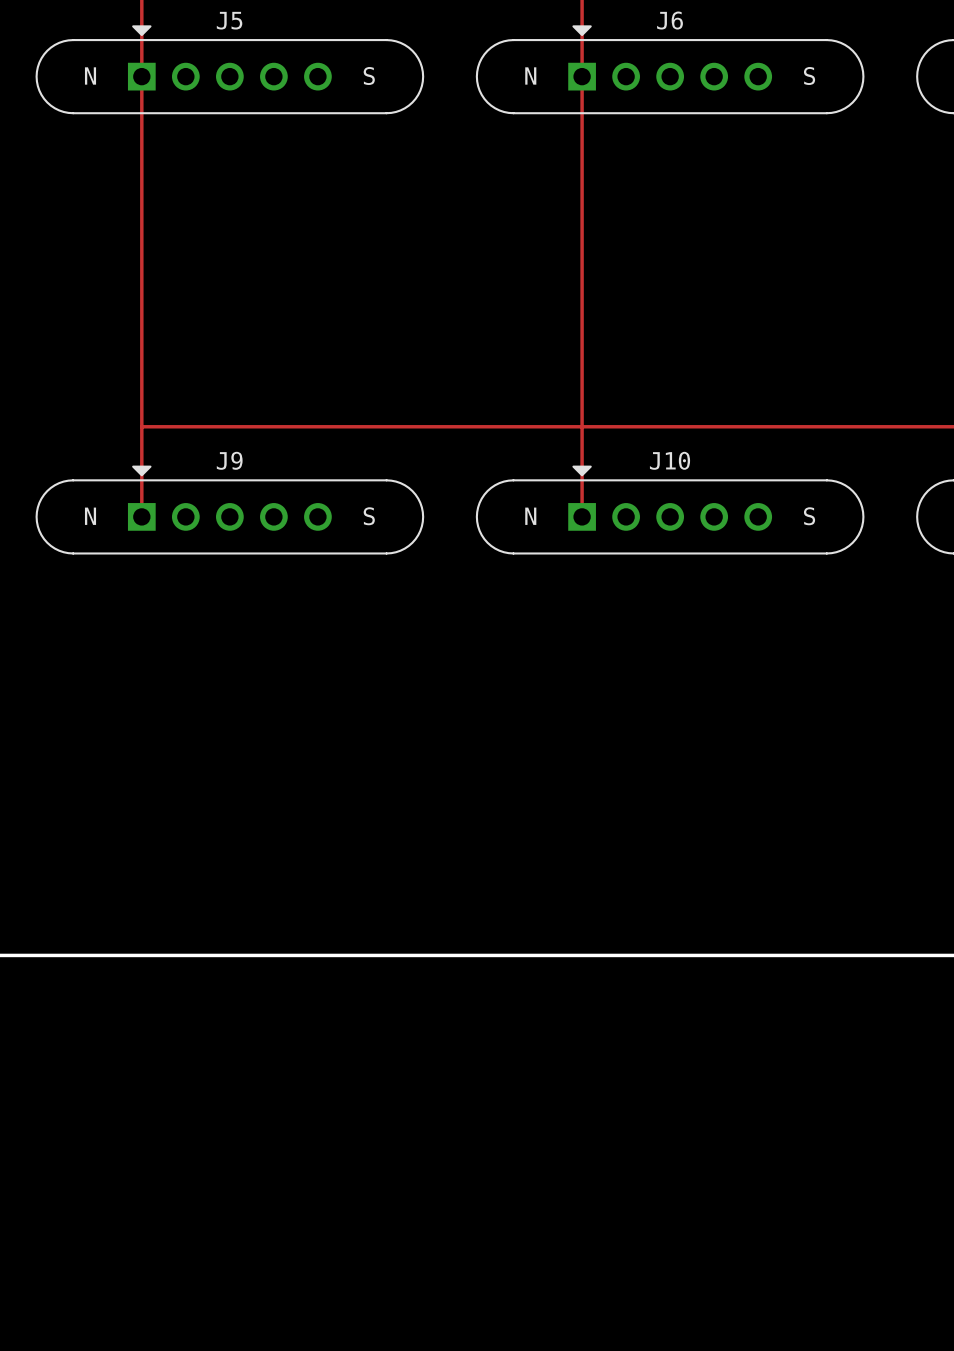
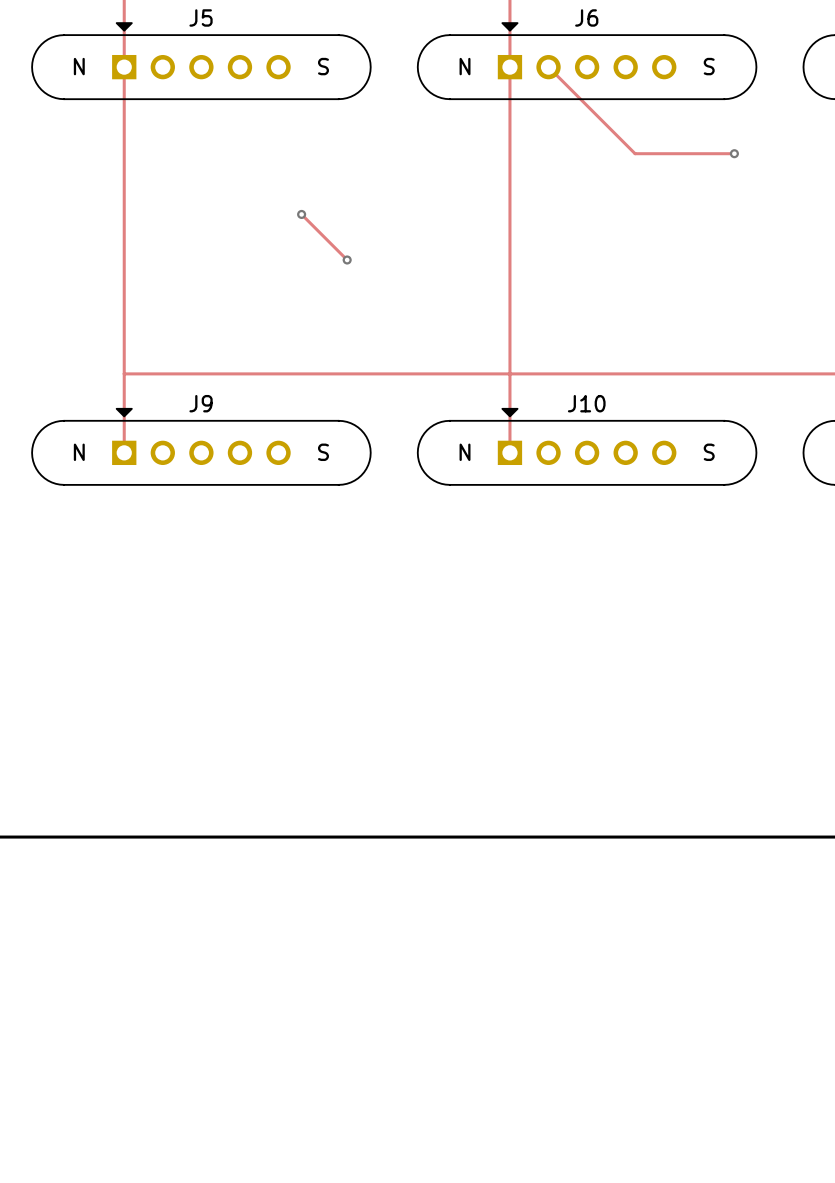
track: none -> (548, 67) (635, 153) (734, 153)
via: none -> (734, 153)
track: none -> (301, 214) (347, 260)
via: none -> (301, 214)
via: none -> (347, 260)

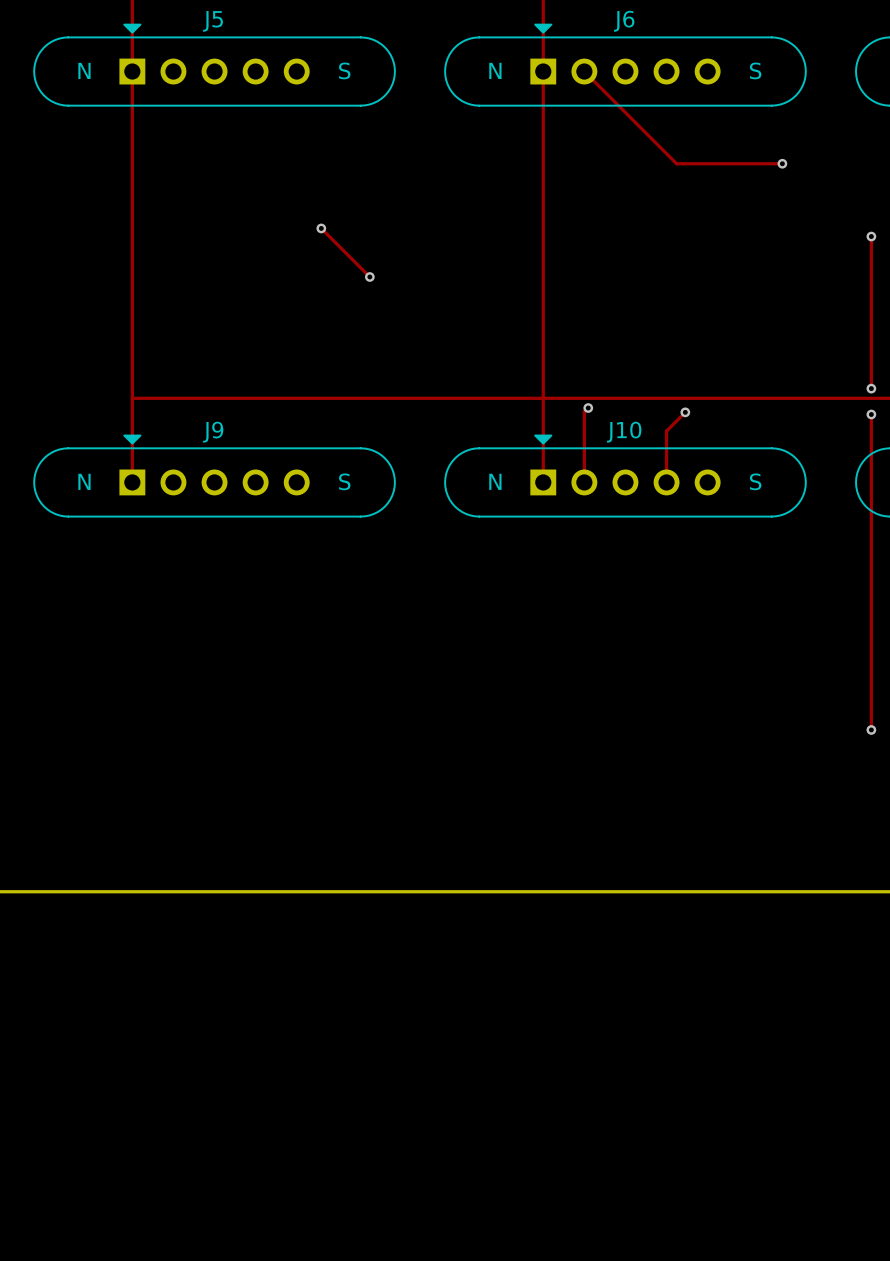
track: none -> (871, 236) (871, 388)
via: none -> (871, 236)
via: none -> (871, 388)
track: none -> (588, 408) (584, 411) (584, 482)
via: none -> (588, 408)
track: none -> (685, 412) (666, 431) (666, 482)
via: none -> (685, 412)
track: none -> (871, 414) (871, 729)
via: none -> (871, 414)
via: none -> (871, 729)

